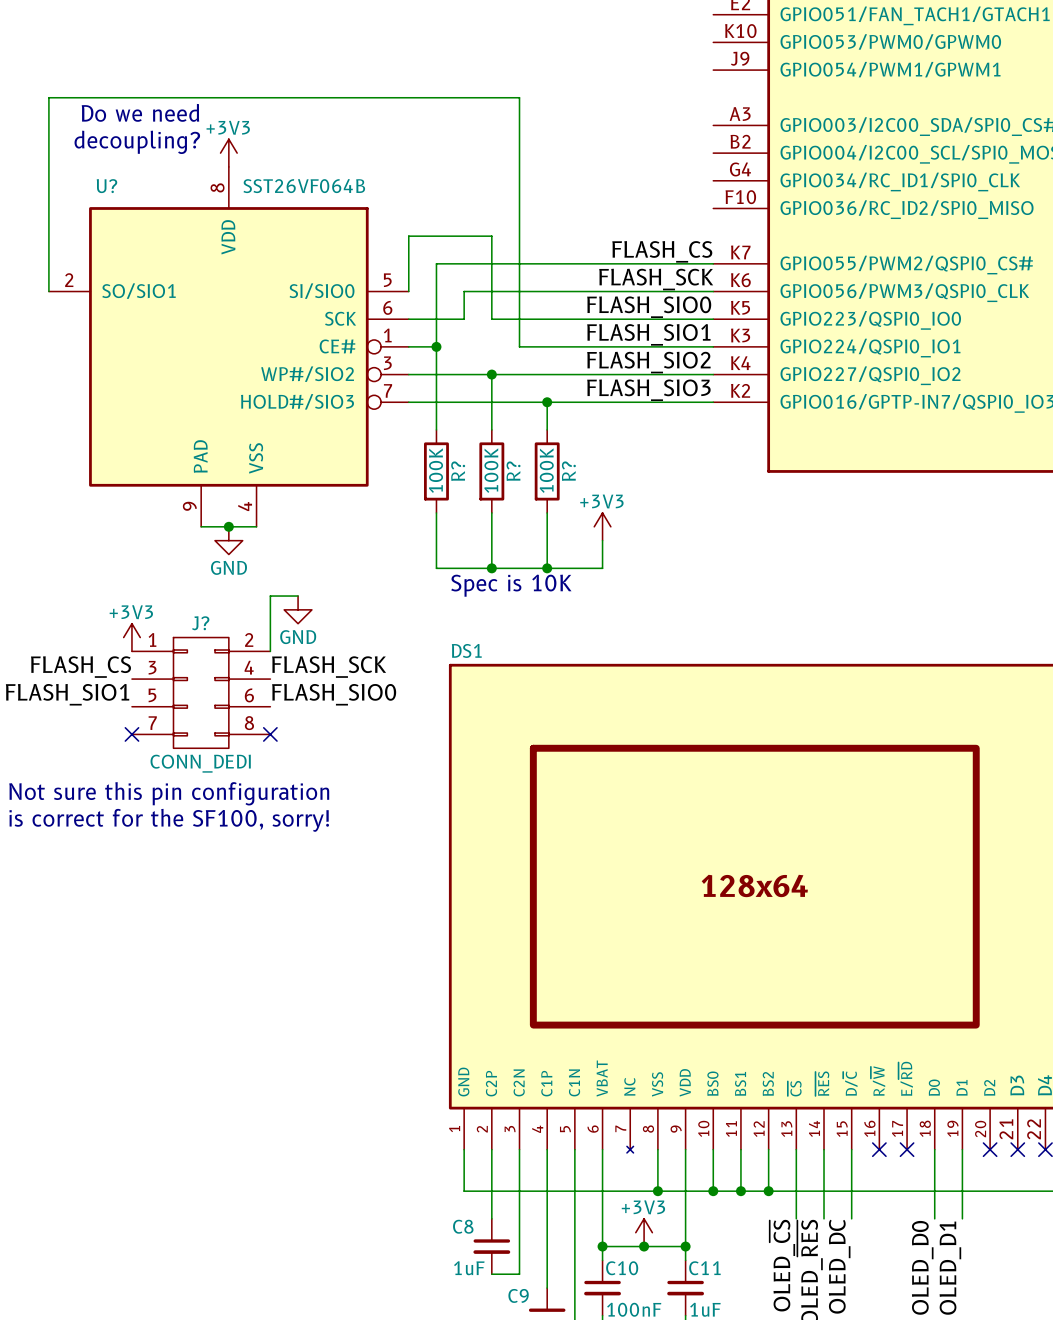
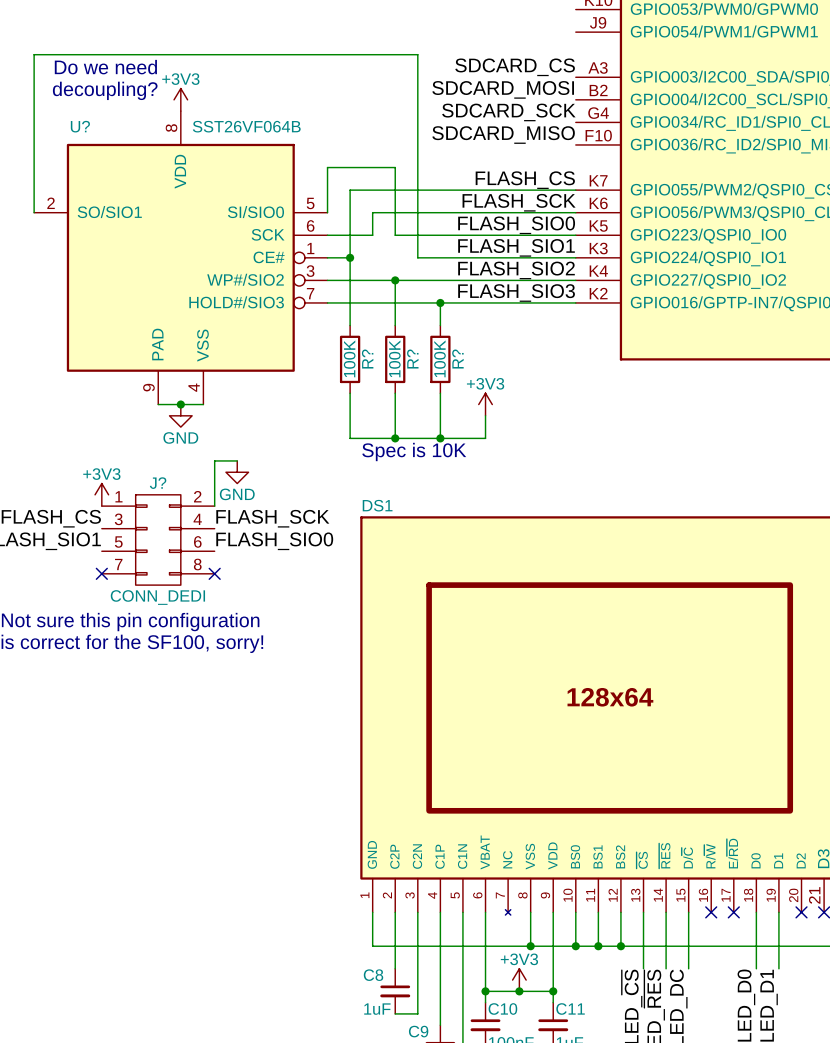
label: none -> SDCARD_CS (515, 67)
label: none -> SDCARD_MOSI (503, 89)
label: none -> SDCARD_SCK (508, 112)
label: none -> SDCARD_MISO (503, 135)

